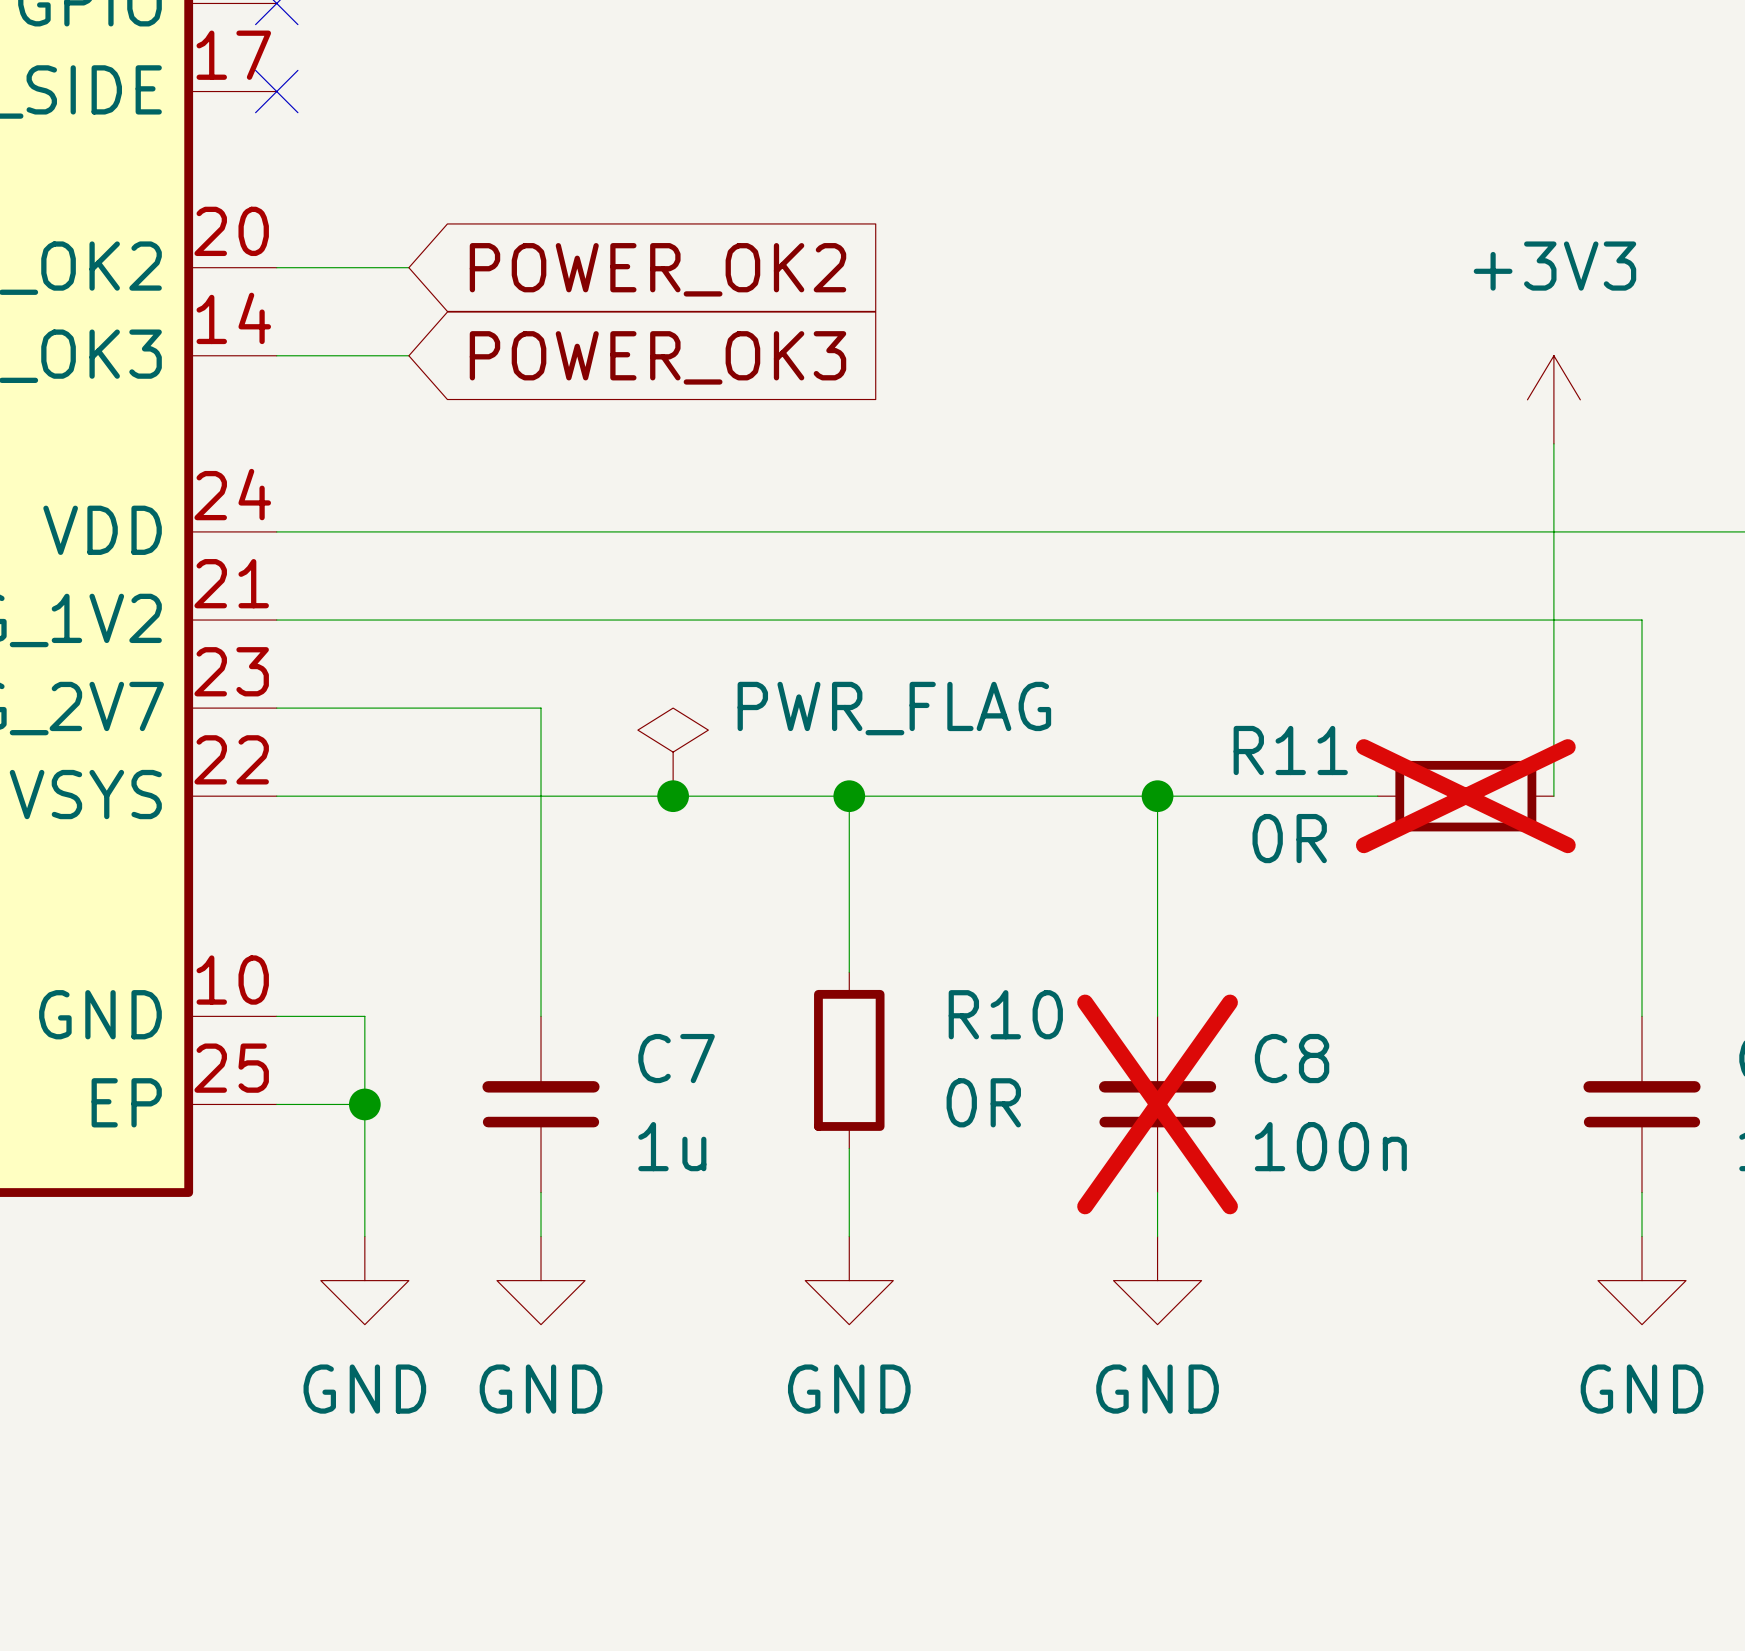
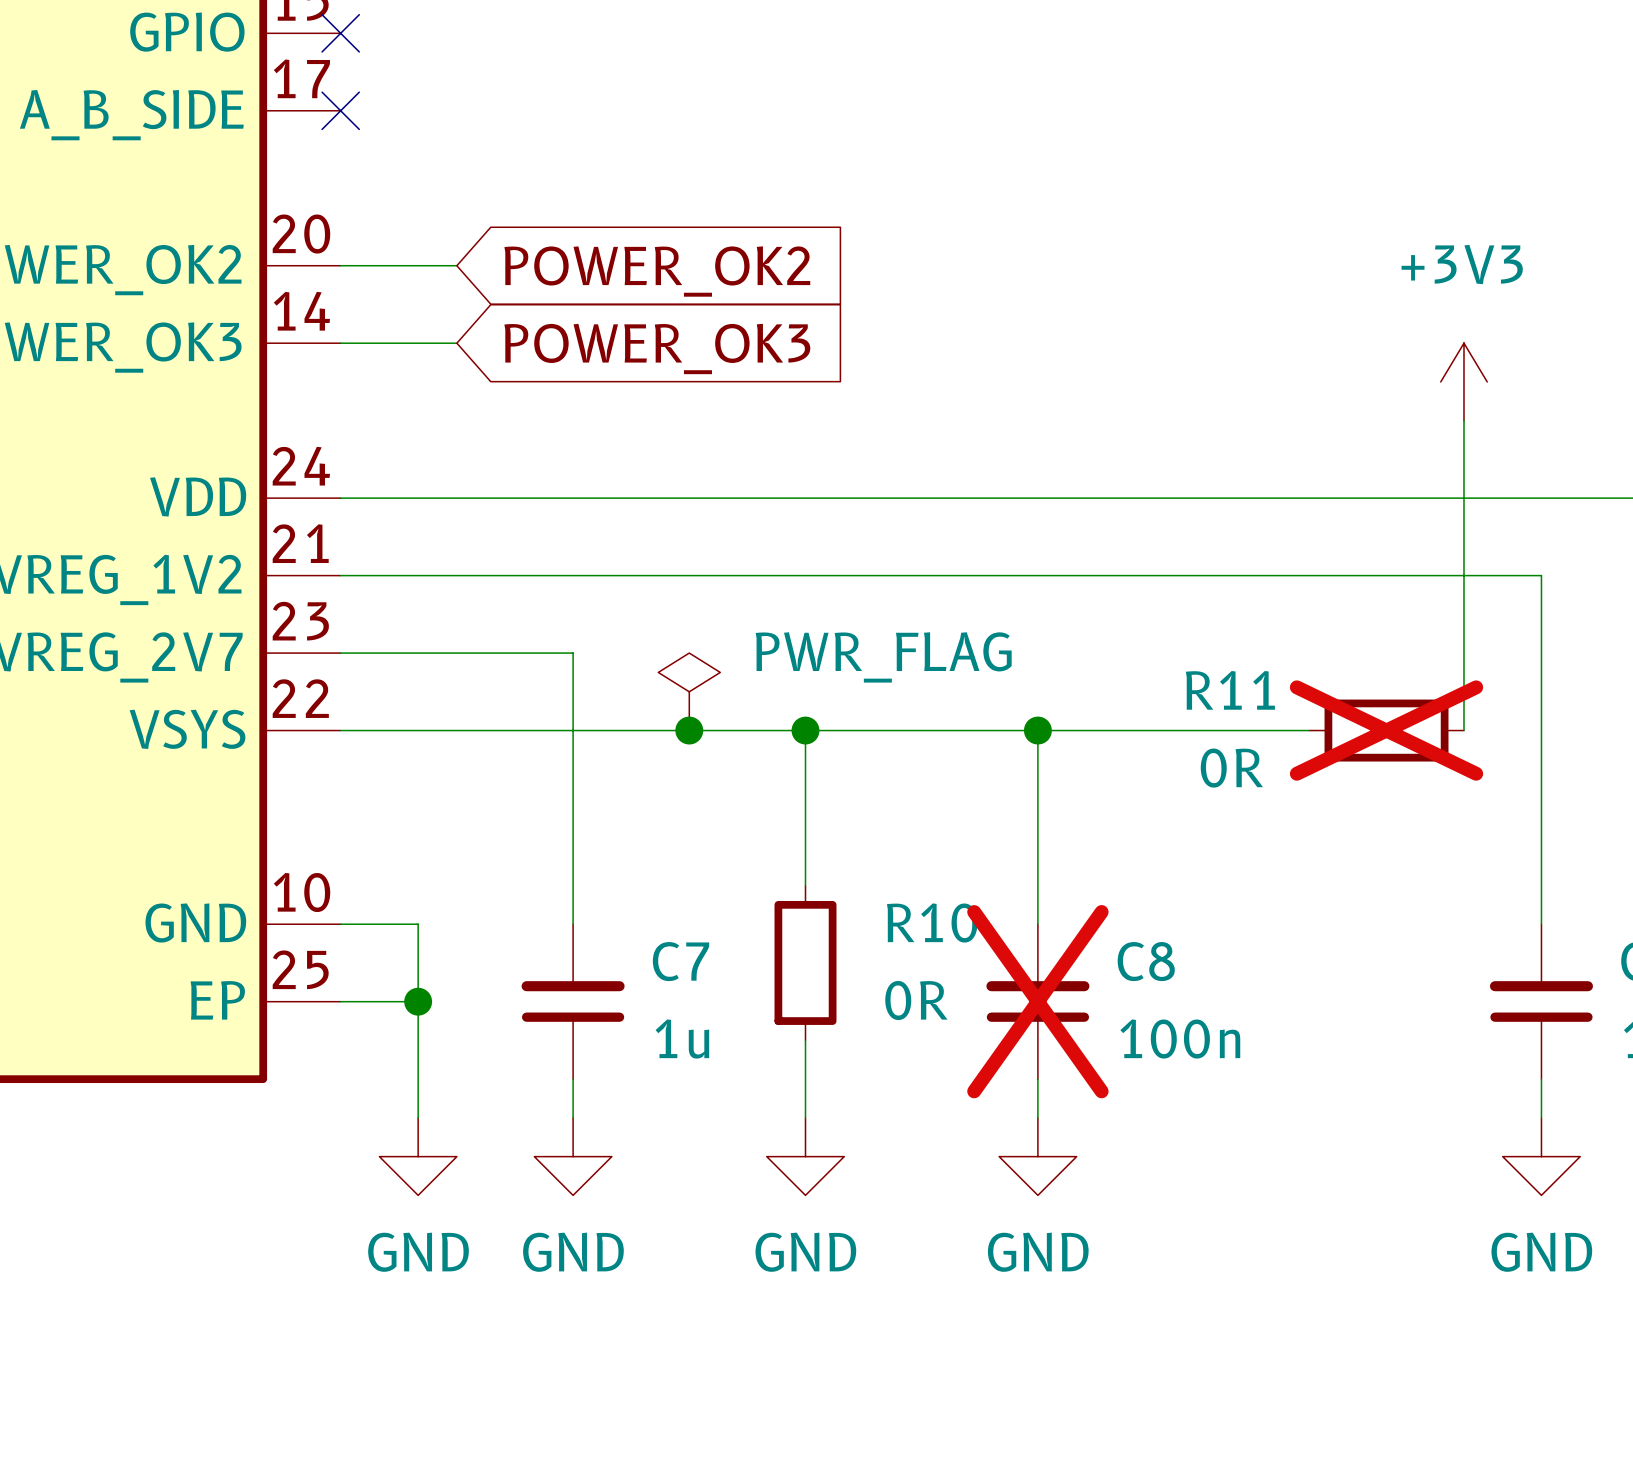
wire: (849, 796) (849, 972) -> (805, 730) (805, 885)
junction position: (849, 796) -> (805, 730)
wire: (1157, 796) (1157, 1016) -> (1037, 730) (1037, 924)
junction position: (1157, 796) -> (1037, 730)
R10 position: (849, 1060) -> (805, 962)
C8 position: (1157, 1104) -> (1037, 1001)
wire: (849, 1148) (849, 1236) -> (805, 1040) (805, 1117)
wire: (1157, 1192) (1157, 1236) -> (1037, 1079) (1037, 1117)
power symbol position: GND (849, 1280) -> GND (805, 1156)
power symbol position: GND (1157, 1280) -> GND (1037, 1156)

